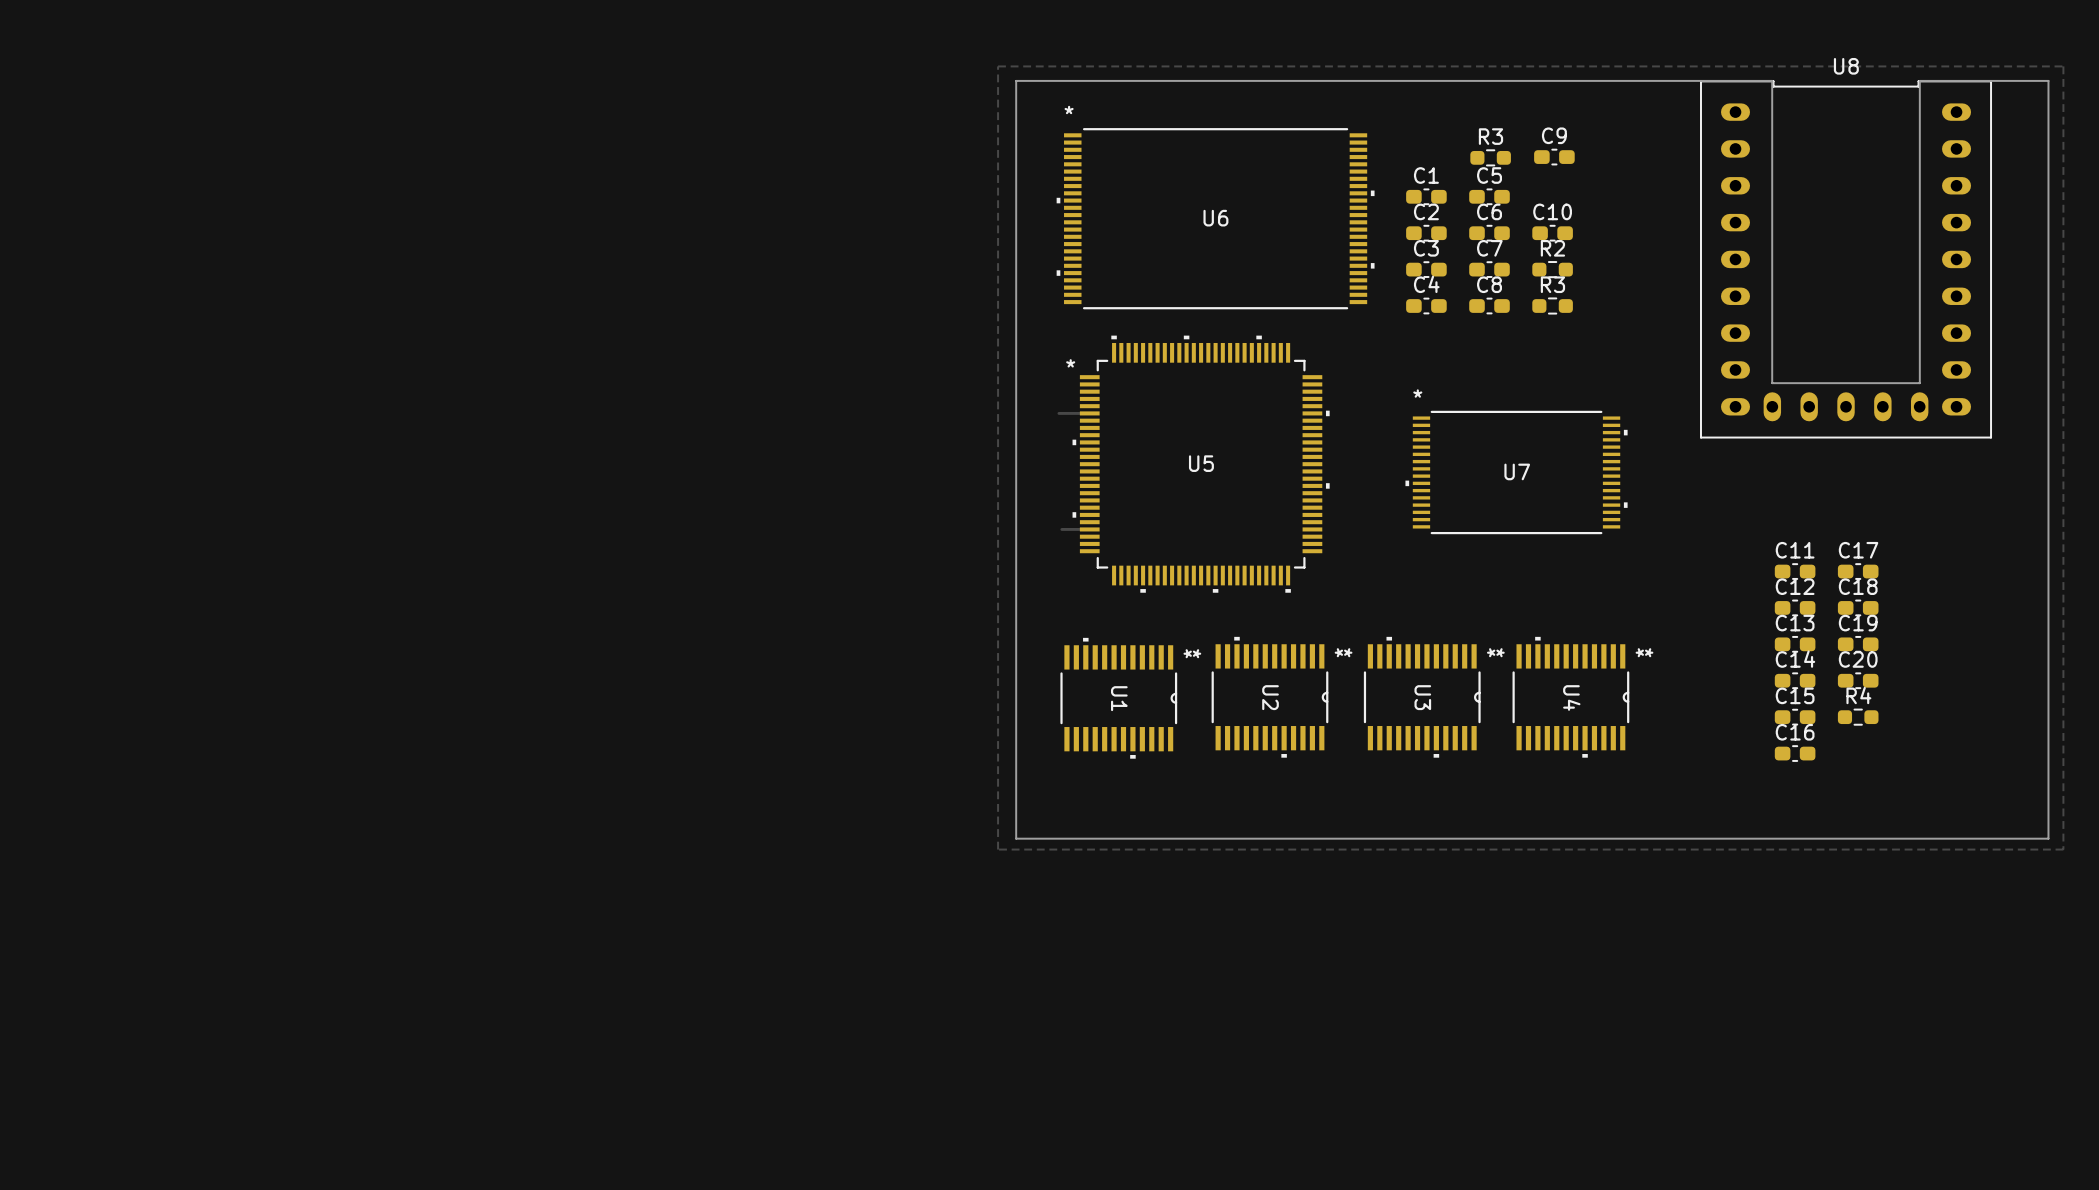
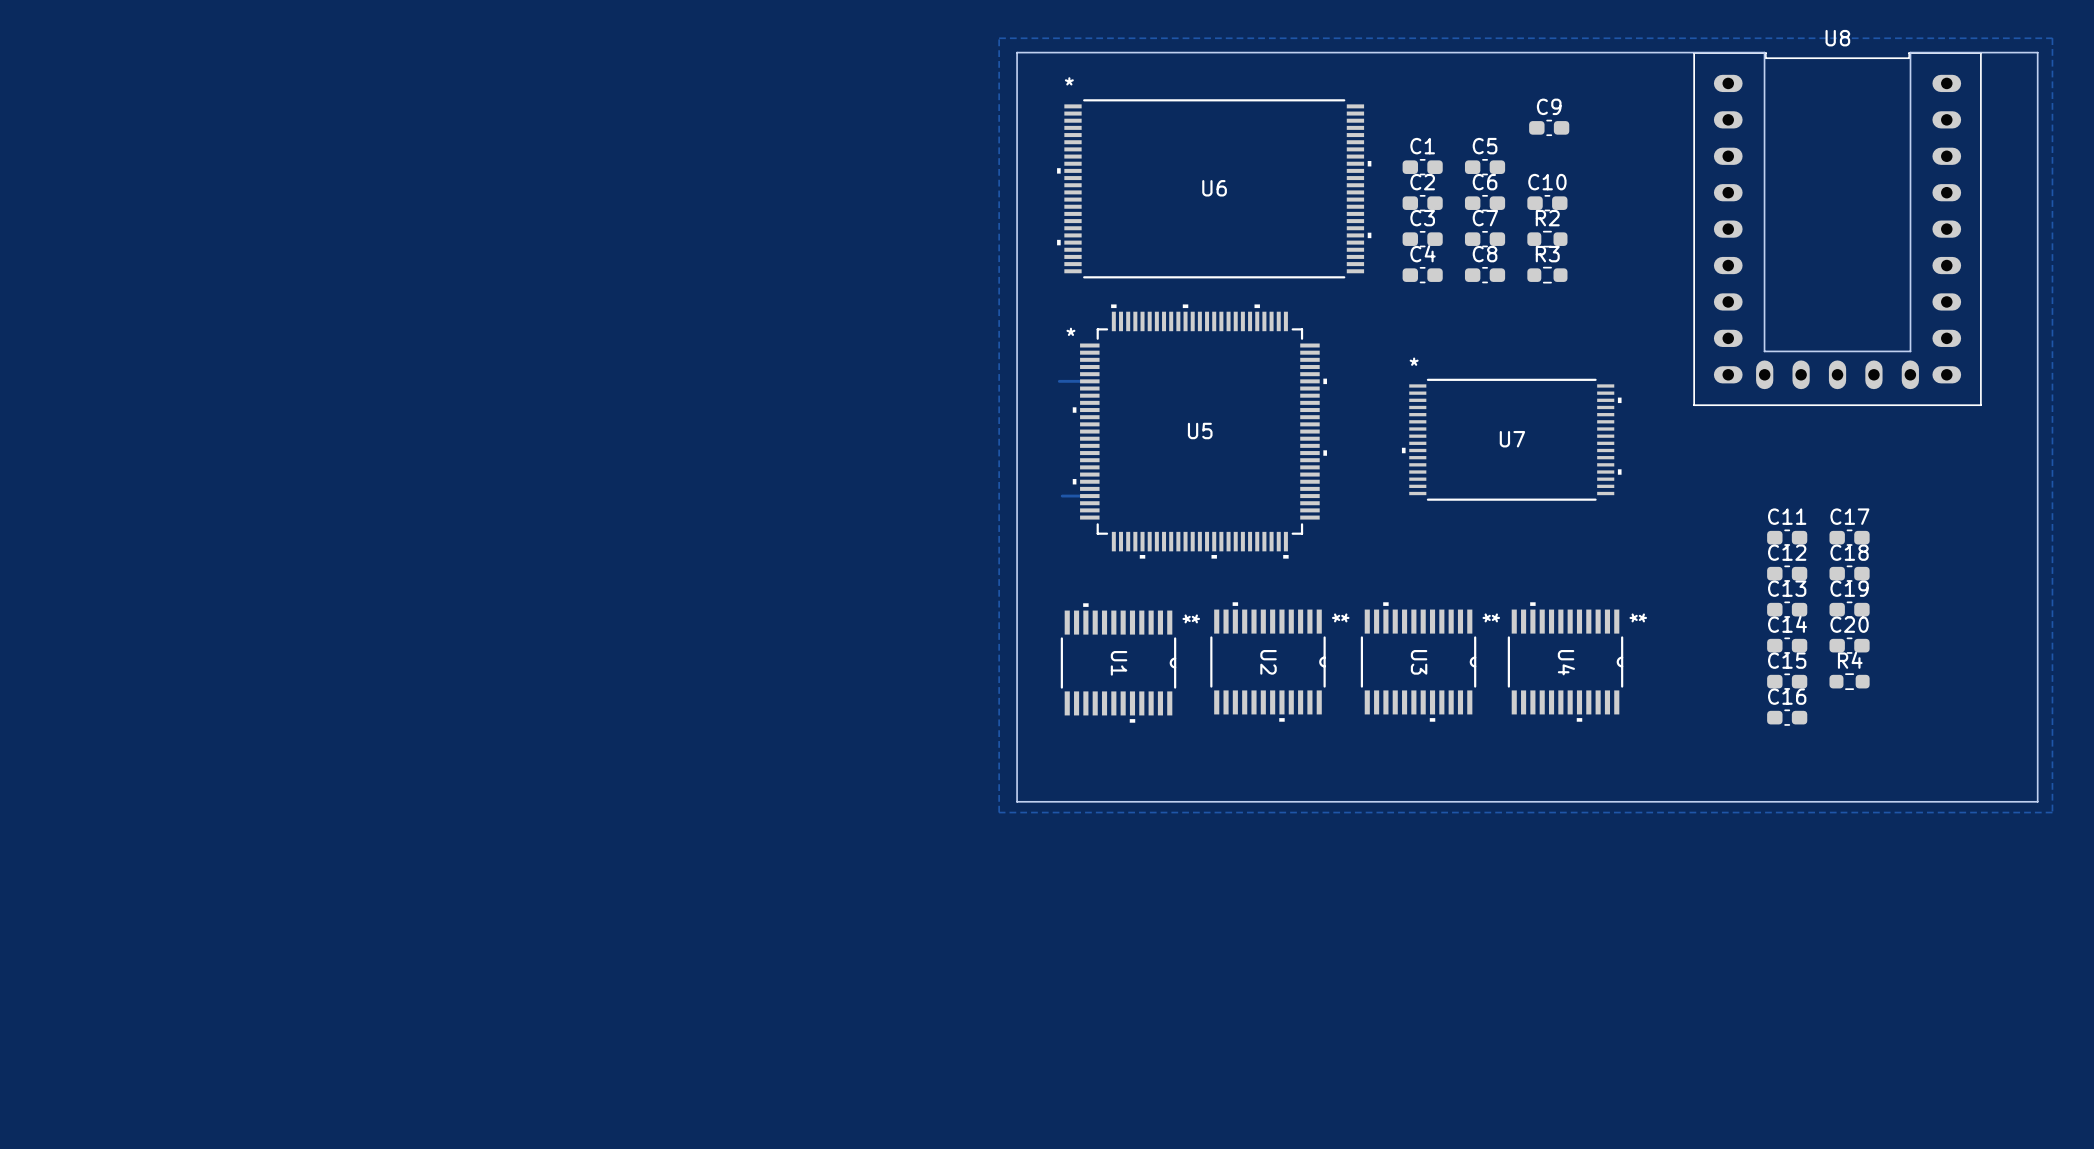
R3: (1490, 157) -> none

